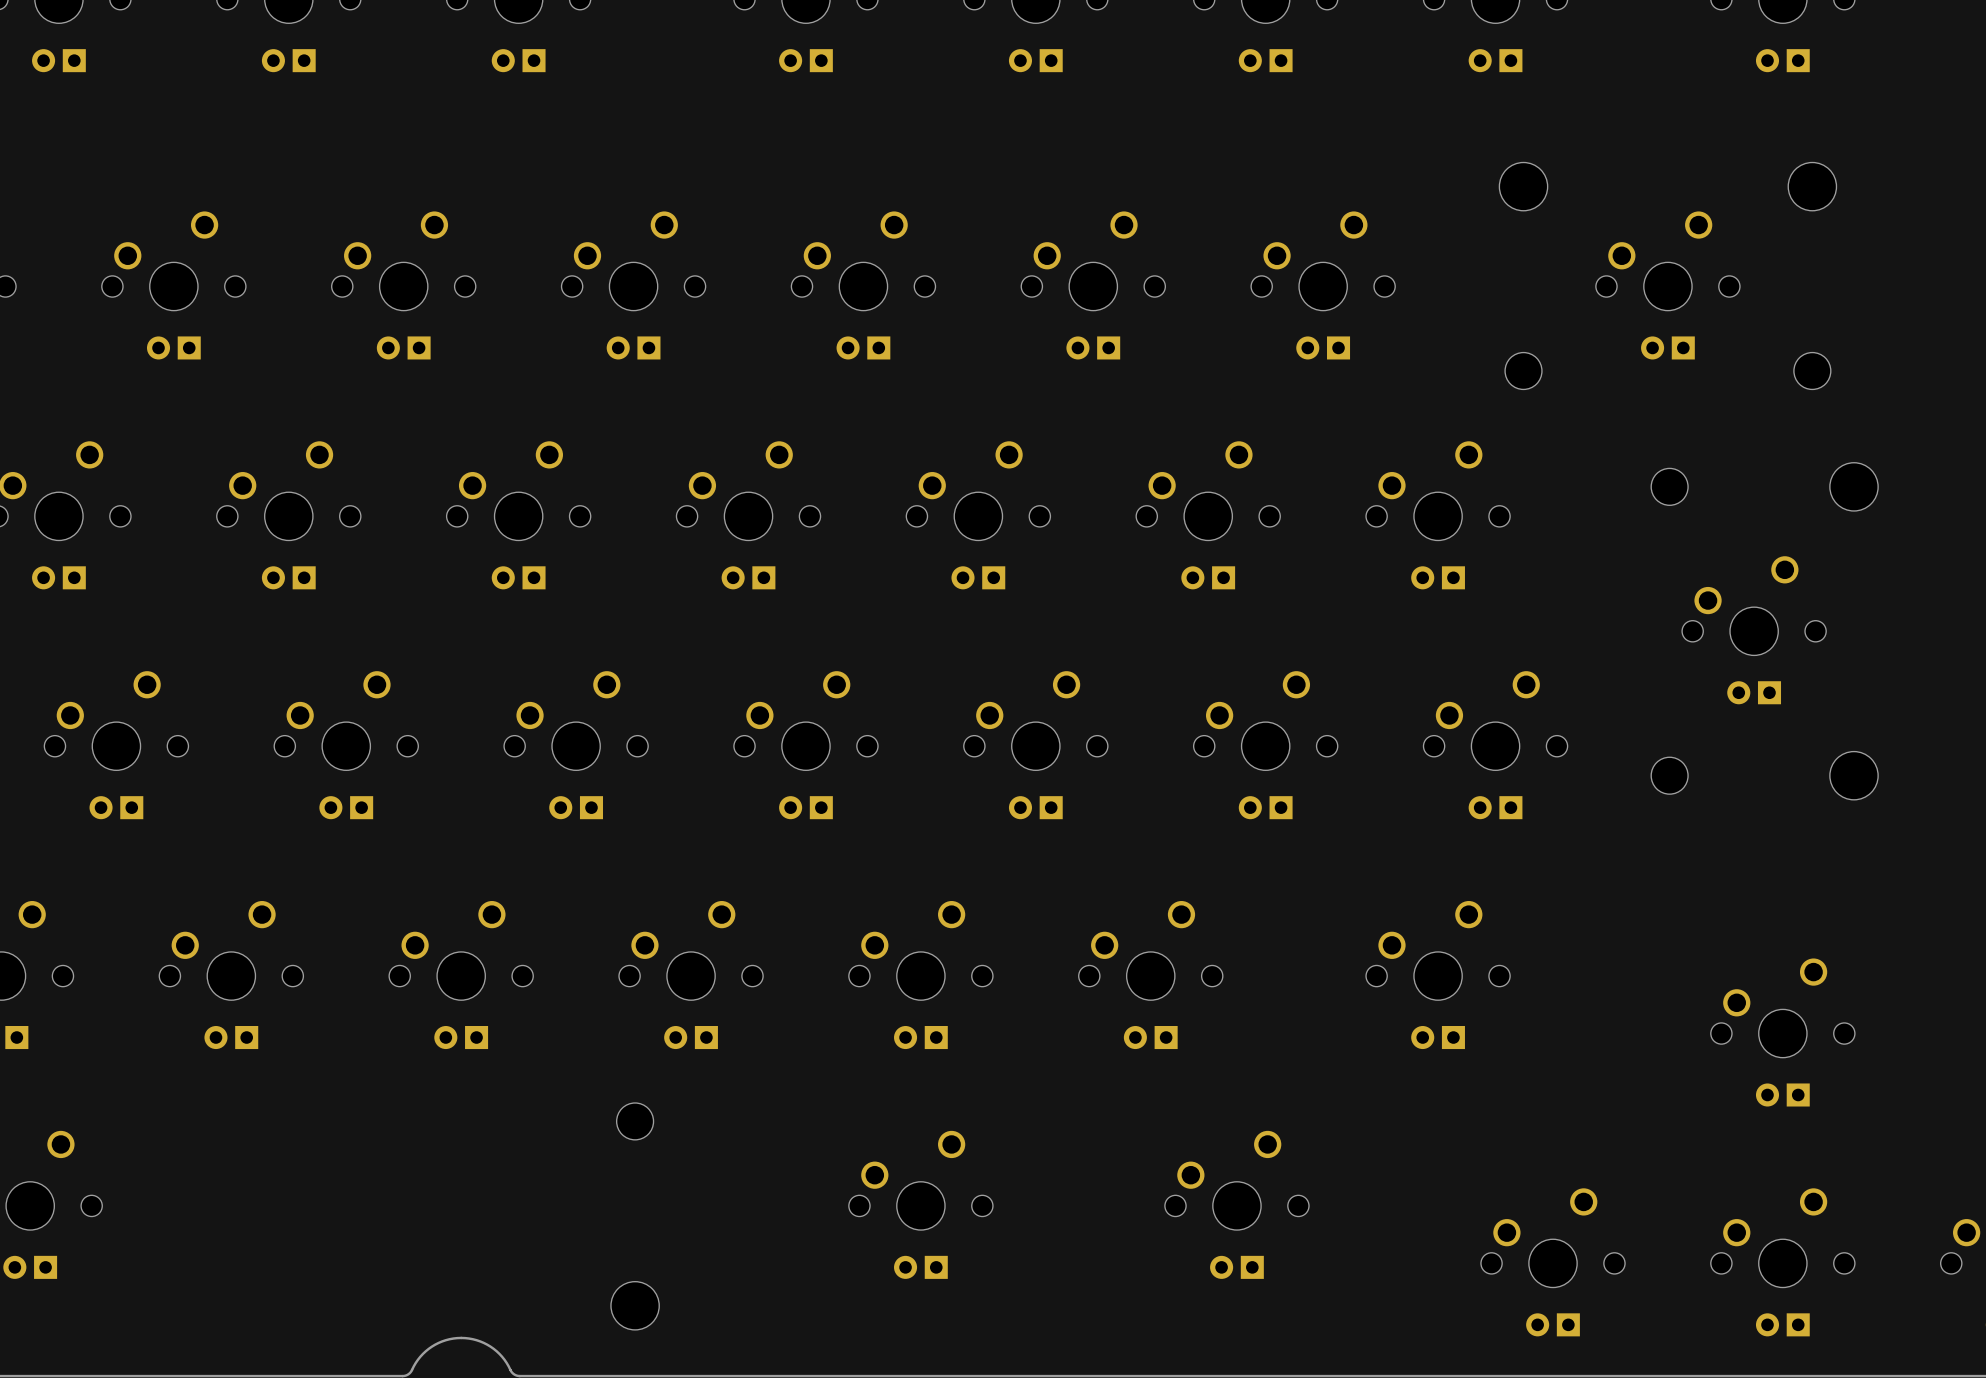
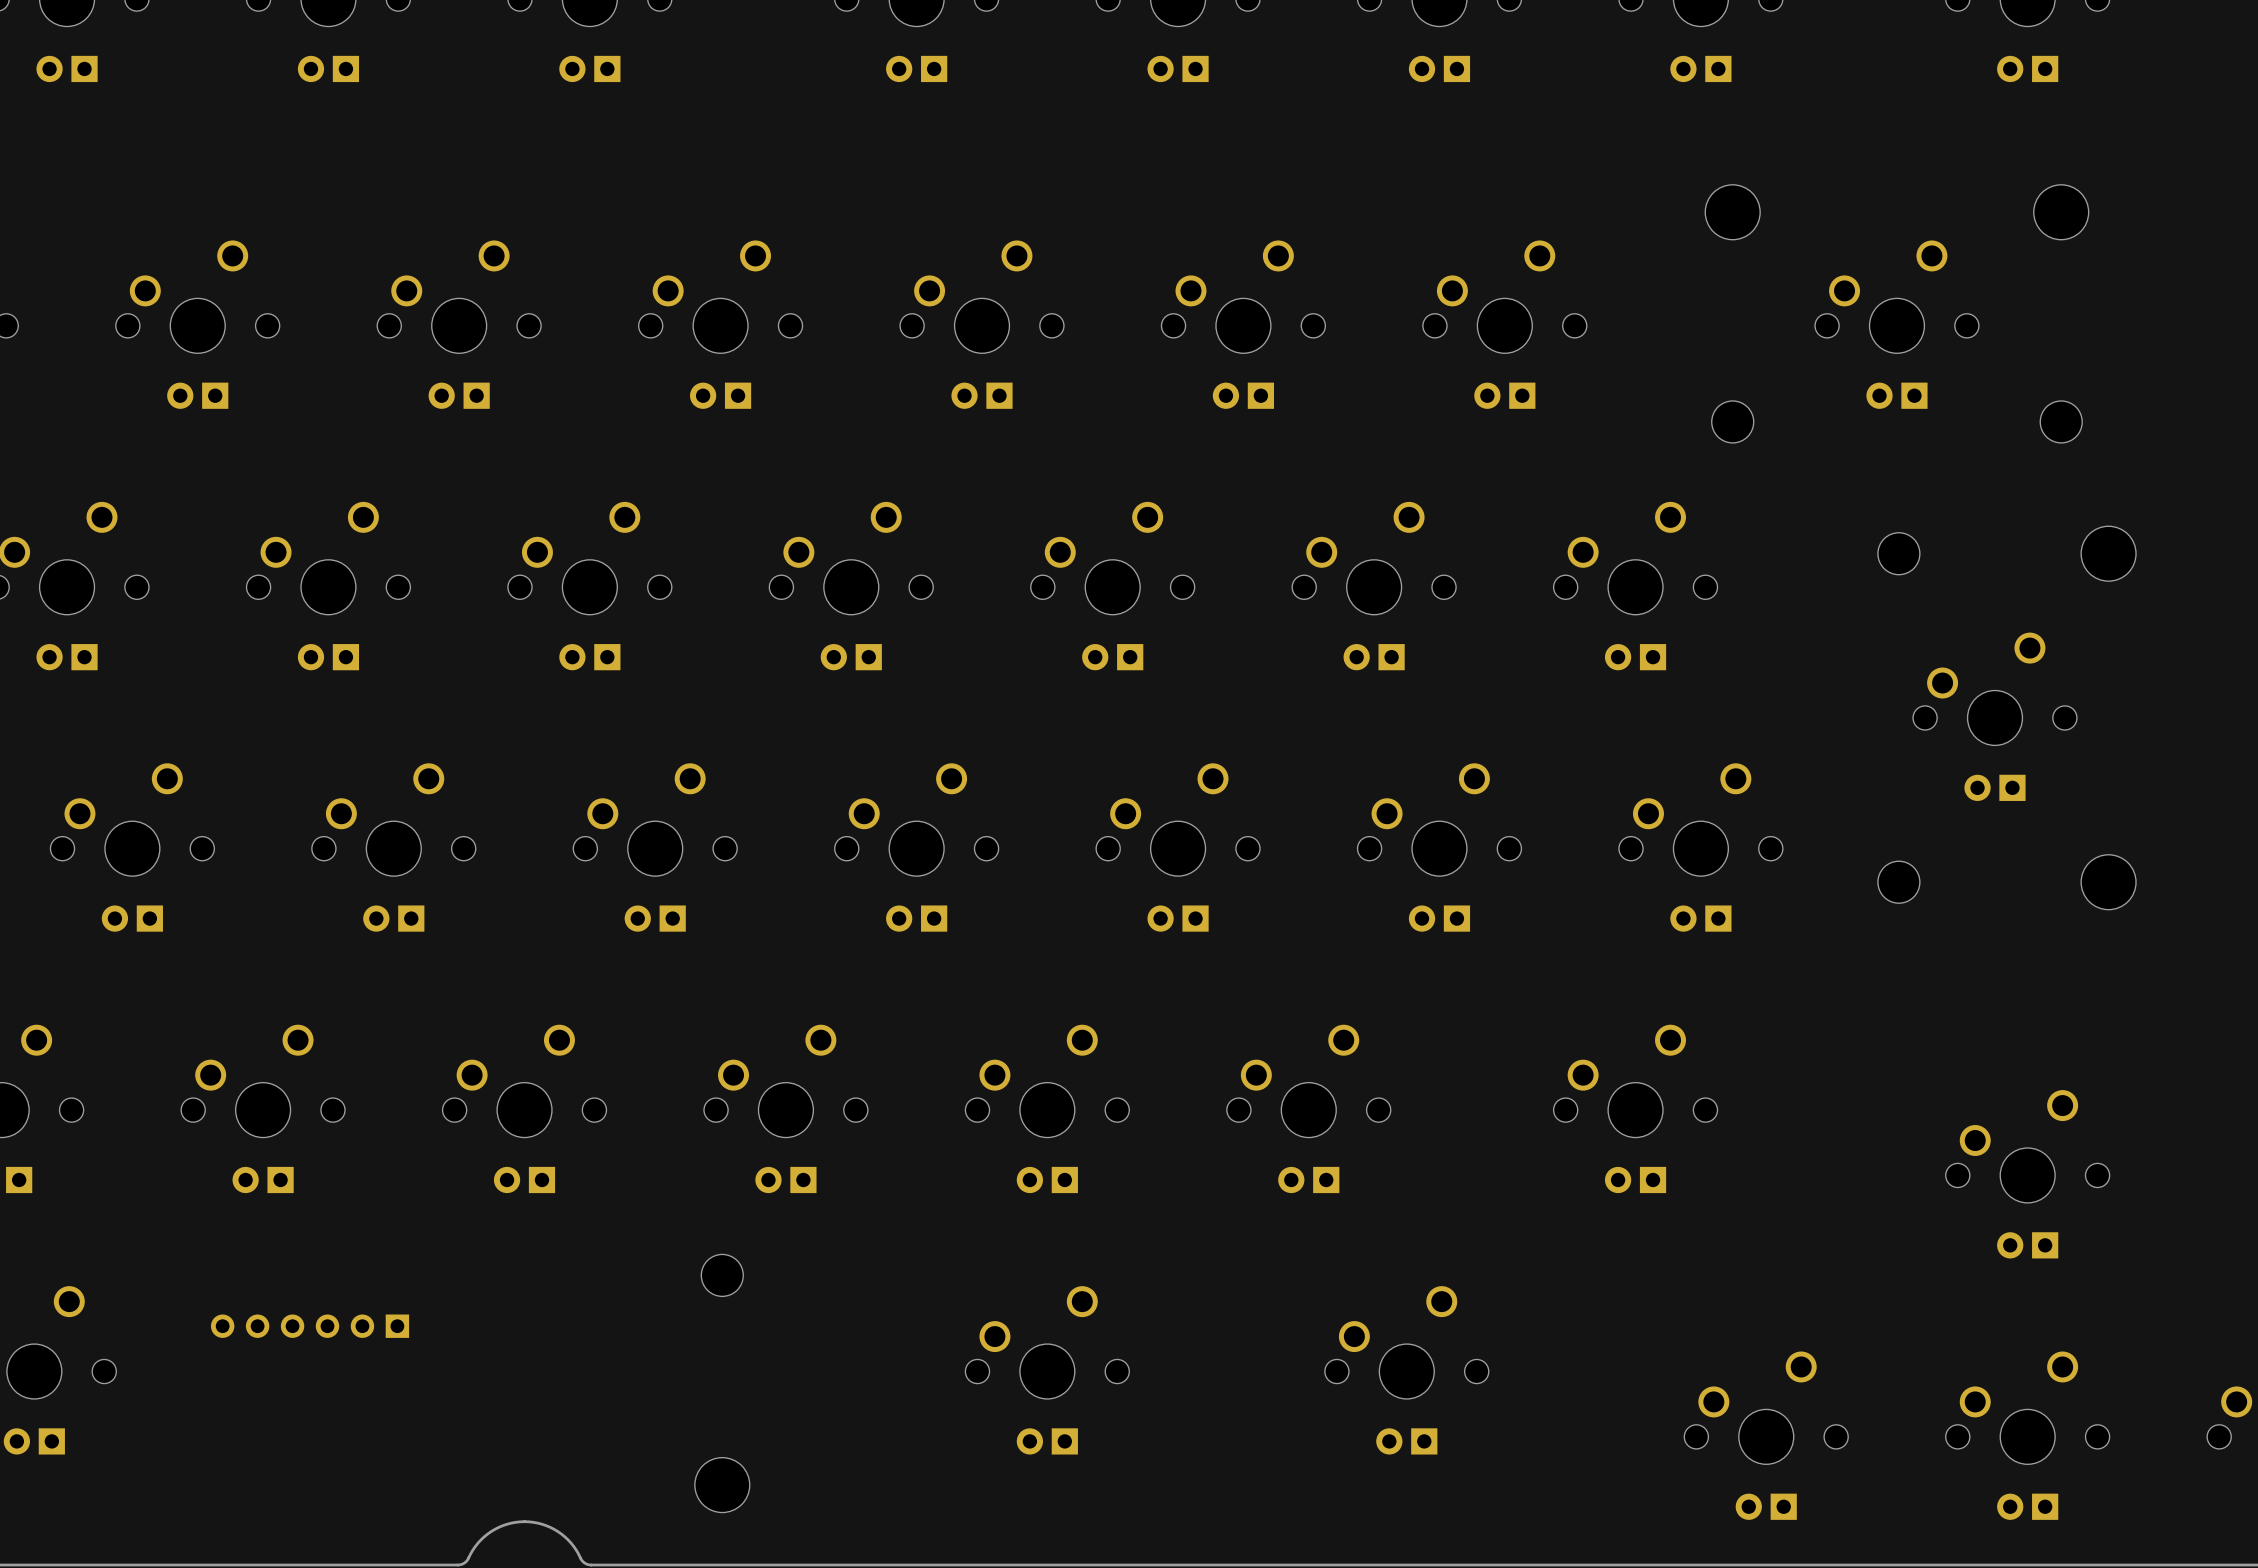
part: none -> (310, 1326)

